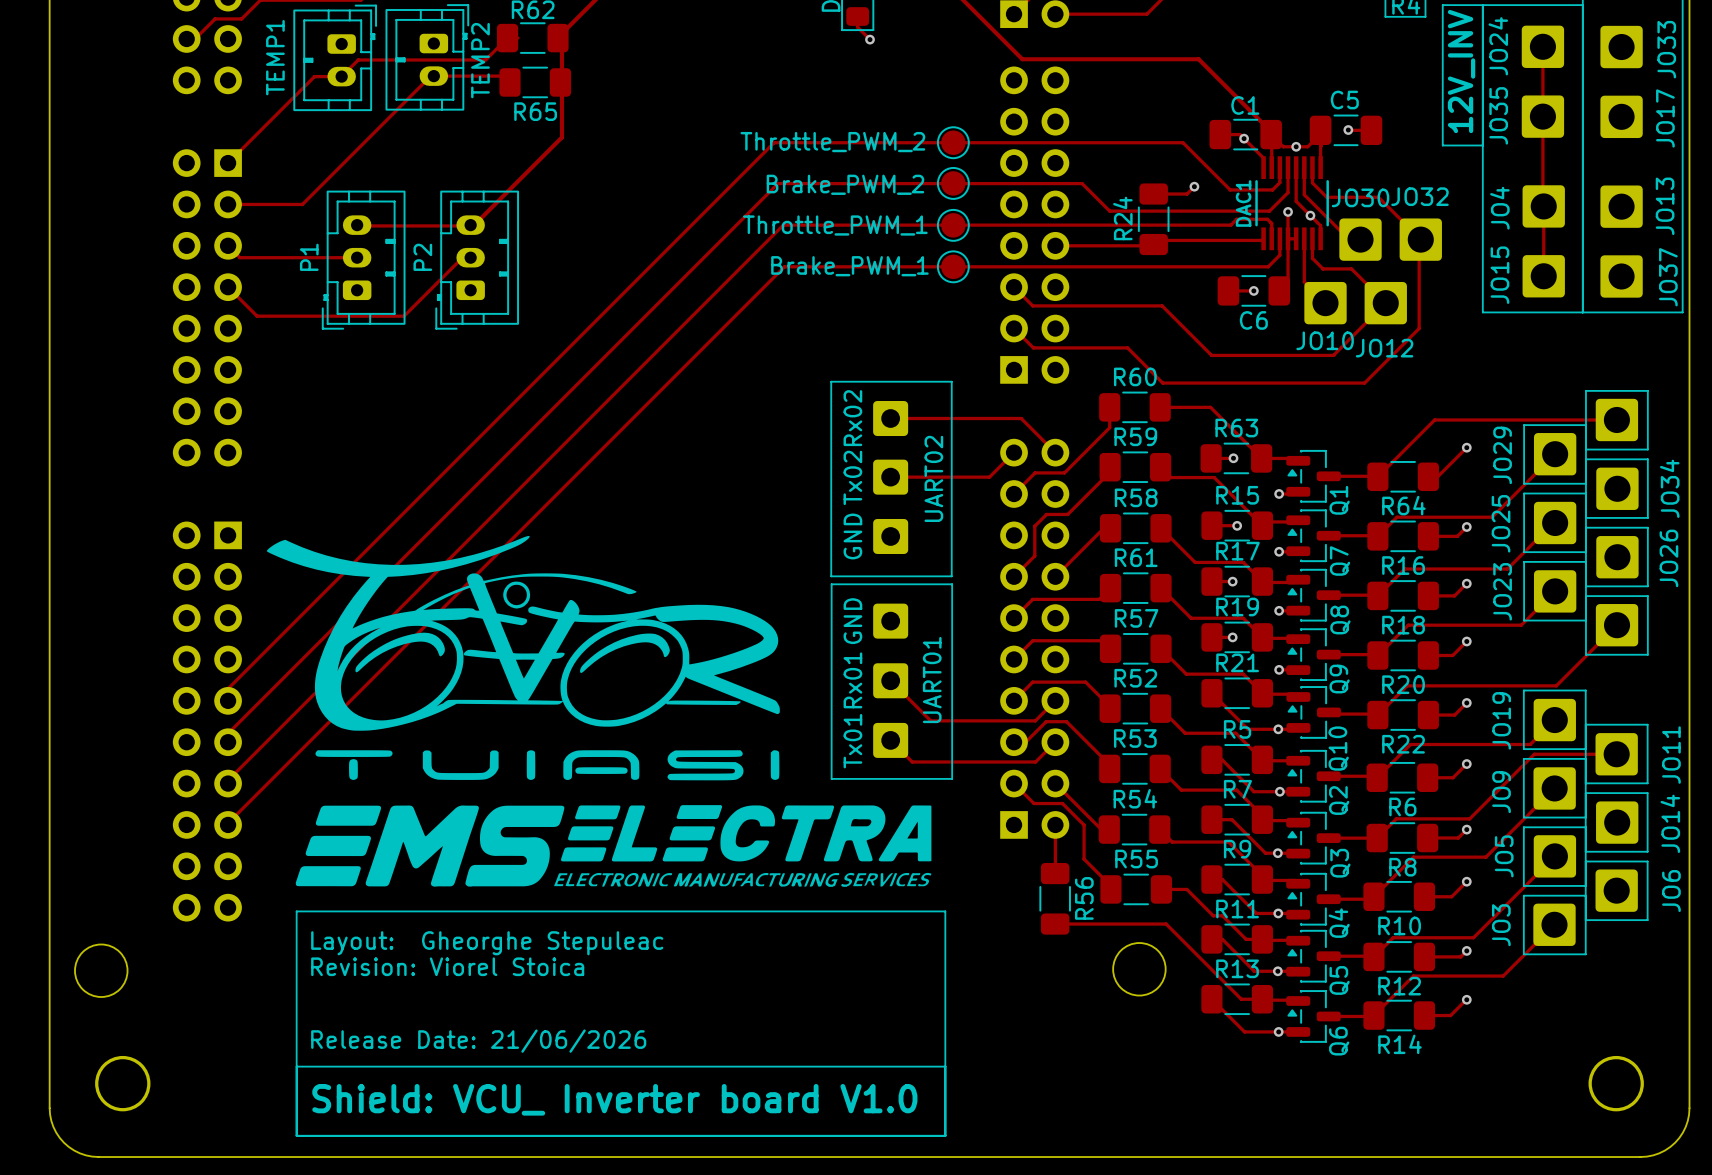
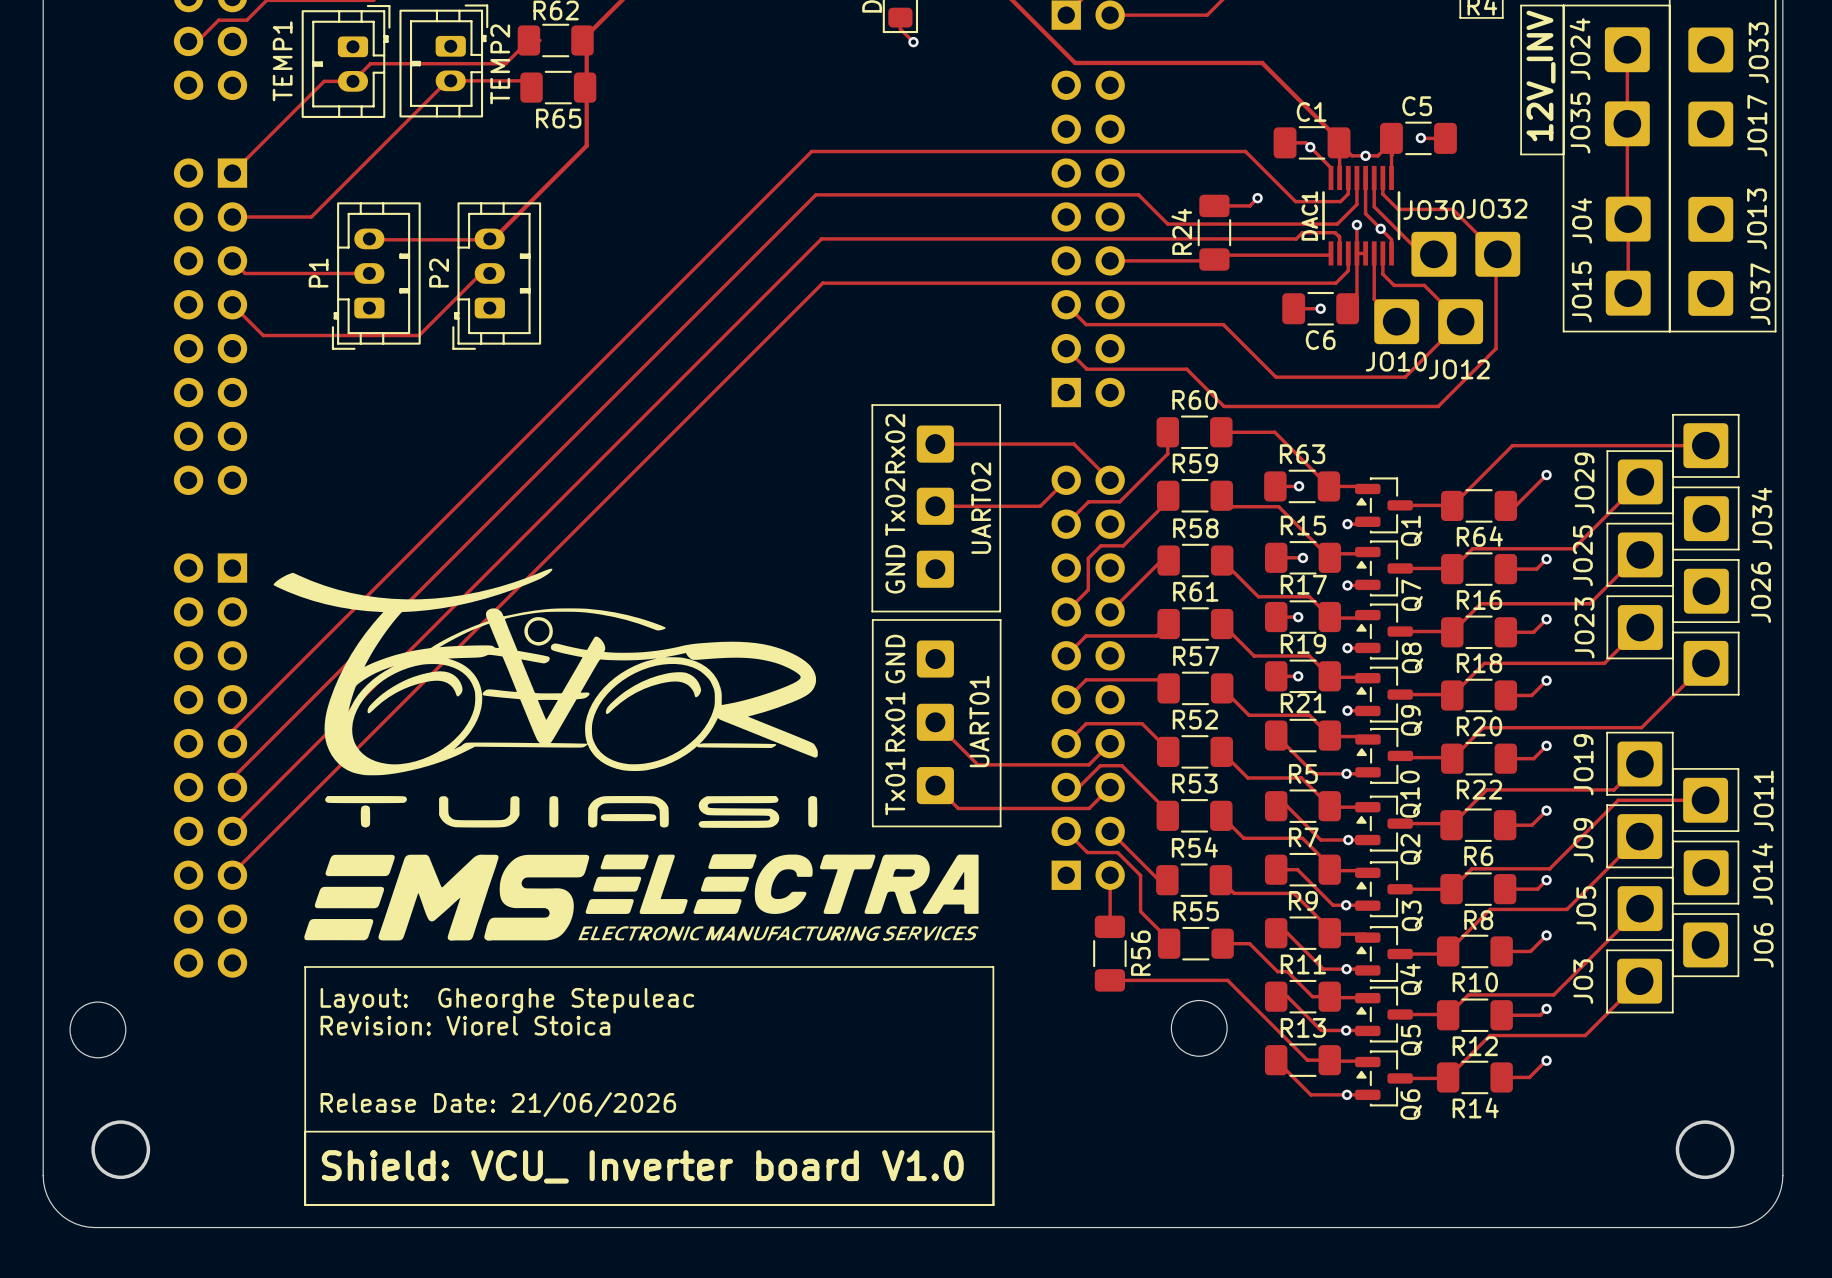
Throttle_PWM_2: (953, 142) -> none
Brake_PWM_2: (953, 183) -> none
Throttle_PWM_1: (953, 225) -> none
Brake_PWM_1: (953, 266) -> none

